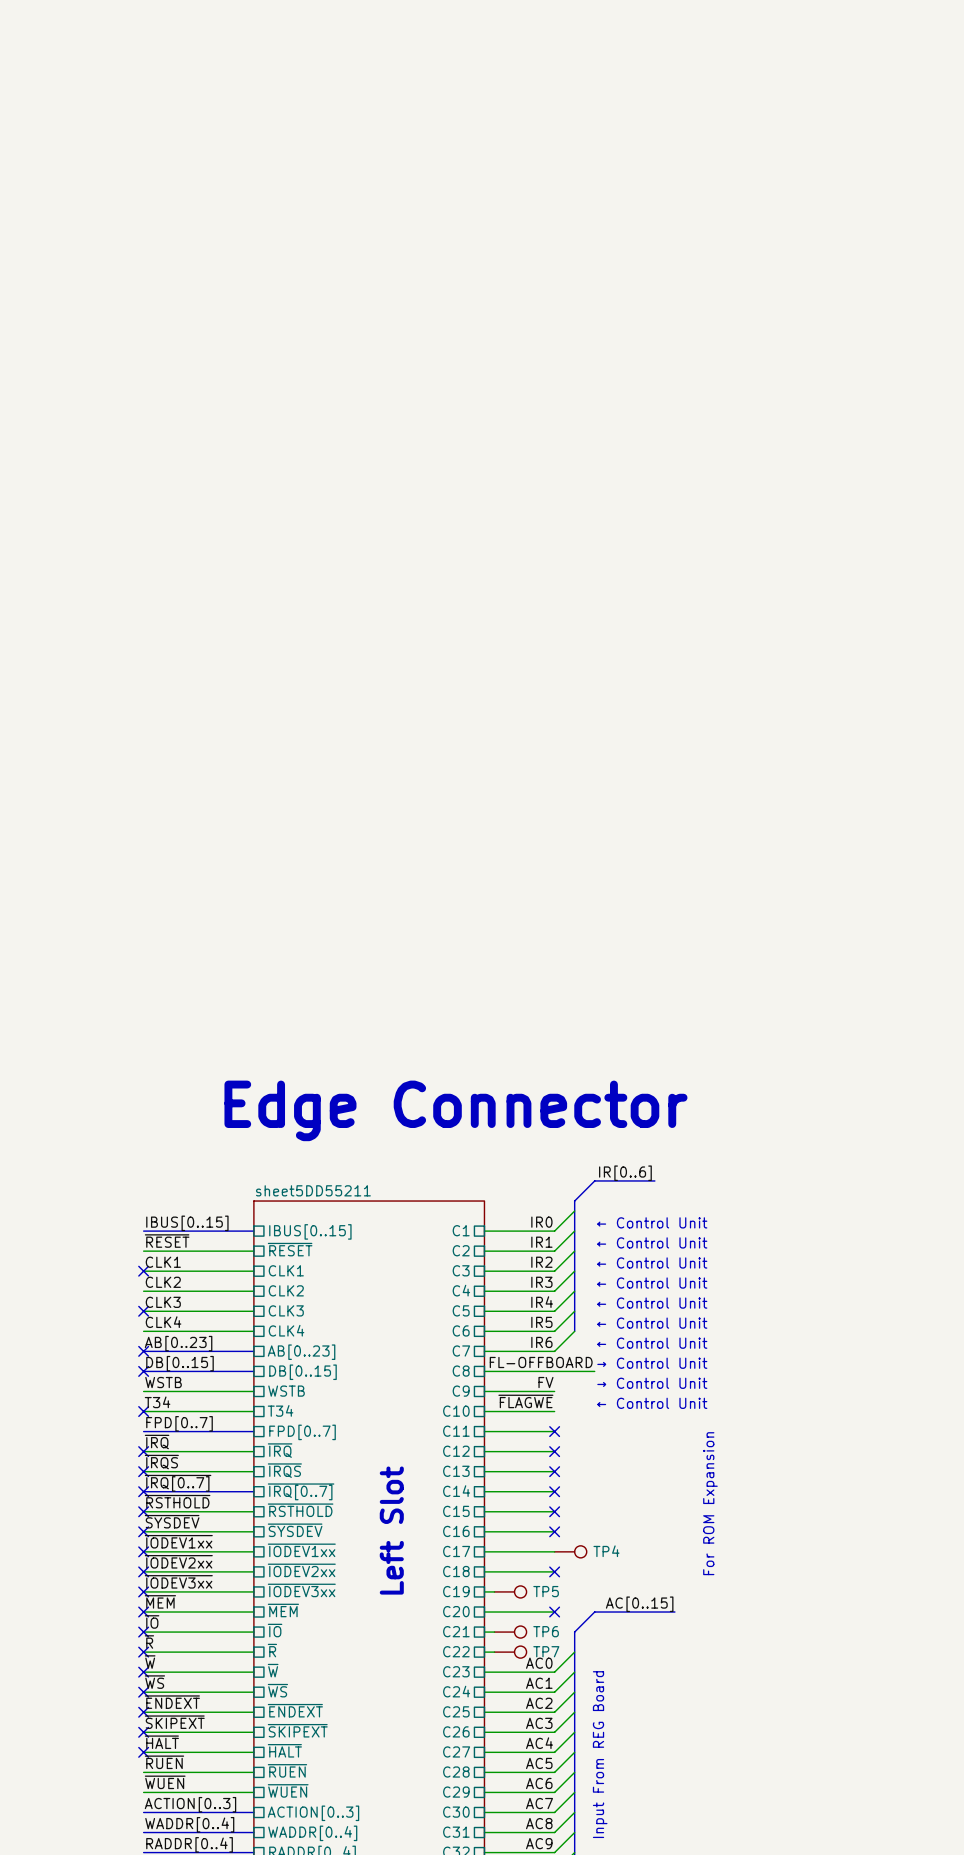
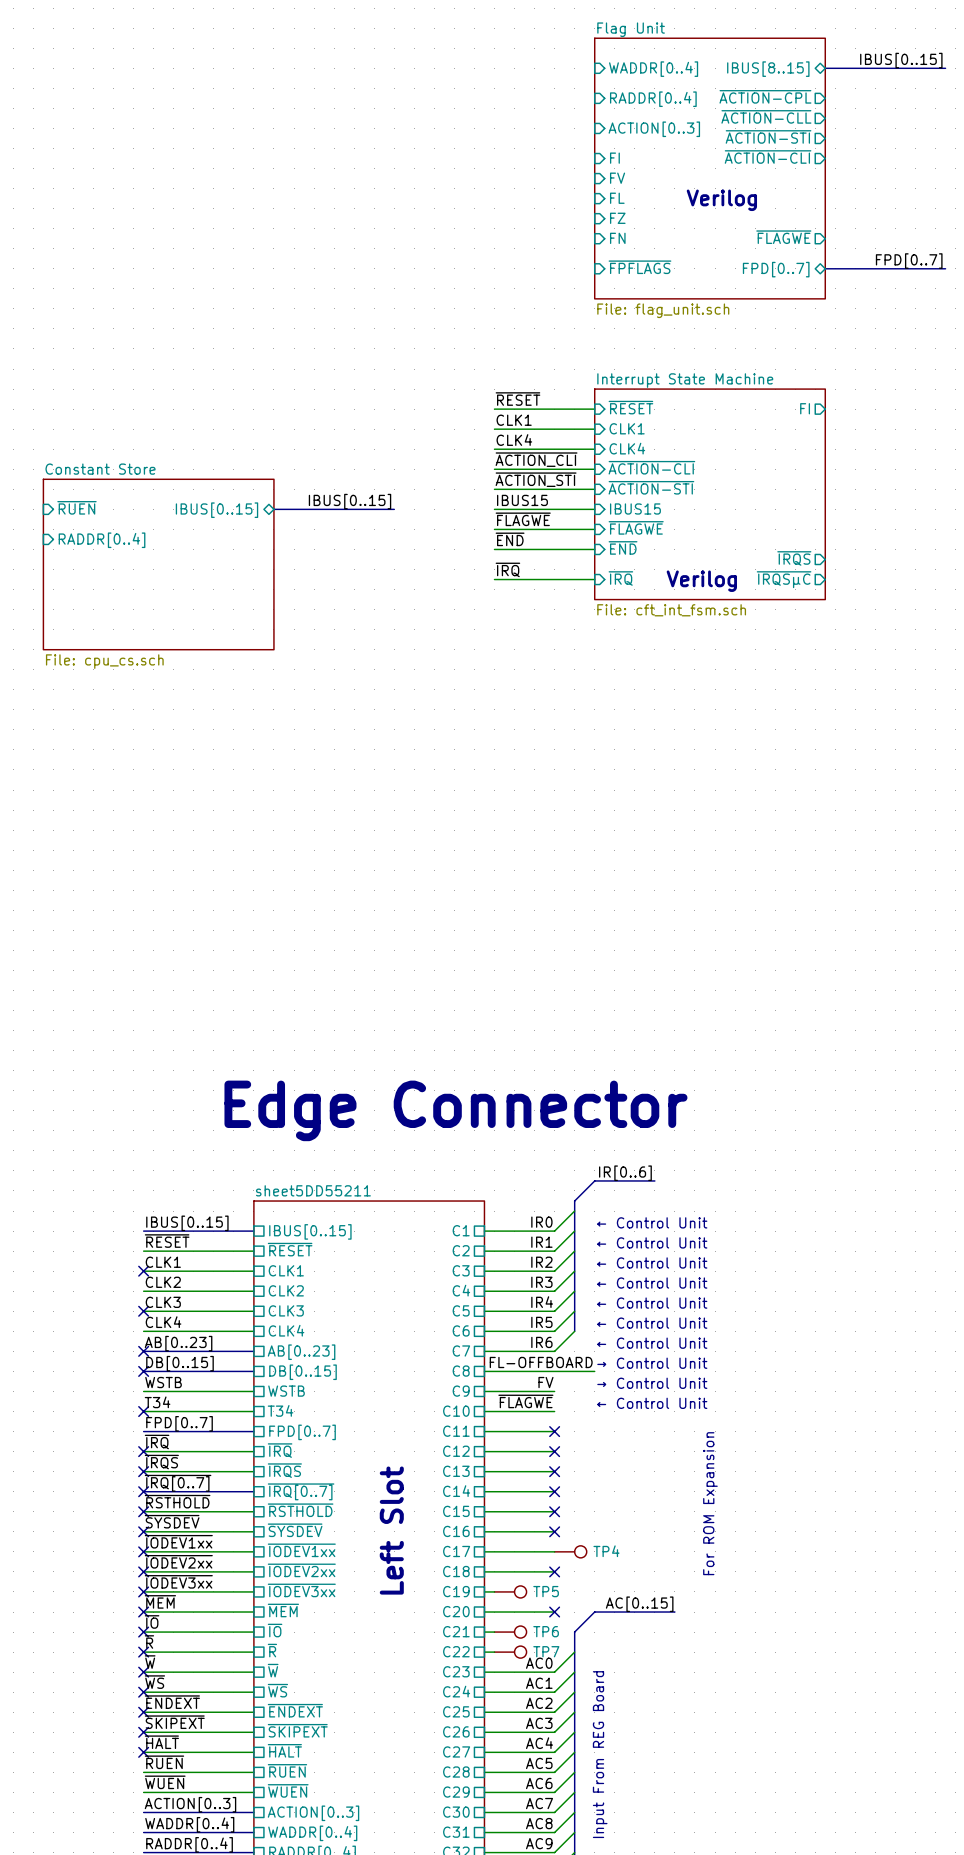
label: none -> IBUS[0..15] (901, 60)
bus: none -> (825, 68) (945, 68)
sheet pin: none -> WADDR[0..4] (653, 69)
sheet pin: none -> IBUS[8..15] (768, 69)
sheet pin: none -> ~{ACTION-CPL} (765, 96)
sheet pin: none -> RADDR[0..4] (653, 99)
sheet pin: none -> ~{ACTION-CLL} (766, 116)
sheet pin: none -> ACTION[0..3] (654, 129)
sheet pin: none -> ~{ACTION-STI} (768, 136)
sheet pin: none -> ~{ACTION-CLI} (768, 157)
sheet pin: none -> FI (614, 158)
sheet Flag Unit: none -> File: flag_unit.sch (710, 168)
sheet pin: none -> FV (617, 178)
sheet pin: none -> FL (617, 198)
text: none -> Verilog (721, 200)
sheet pin: none -> FZ (617, 218)
sheet pin: none -> ~{FLAGWE} (783, 237)
sheet pin: none -> FN (617, 238)
label: none -> FPD[0..7] (909, 261)
sheet pin: none -> ~{FPFLAGS} (639, 267)
bus: none -> (825, 268) (945, 268)
sheet pin: none -> FPD[0..7] (776, 269)
label: none -> ~{RESET} (517, 399)
sheet pin: none -> ~{RESET} (630, 407)
sheet pin: none -> FI (805, 408)
wire: none -> (494, 409) (594, 409)
label: none -> CLK1 (514, 420)
sheet pin: none -> CLK1 (627, 428)
wire: none -> (494, 429) (594, 429)
label: none -> CLK4 (514, 440)
sheet pin: none -> CLK4 (627, 448)
wire: none -> (494, 449) (594, 449)
label: none -> ~{ACTION_CLI} (536, 459)
sheet pin: none -> ~{ACTION-CLI} (651, 467)
wire: none -> (494, 469) (594, 469)
label: none -> ~{ACTION_STI} (536, 479)
sheet pin: none -> ~{ACTION-STI} (651, 487)
wire: none -> (494, 489) (594, 489)
sheet Interrupt State Machine: none -> File: cft_int_fsm.sch (710, 494)
label: none -> IBUS15 (522, 500)
label: none -> IBUS[0..15] (350, 501)
sheet pin: none -> ~{RUEN} (76, 507)
sheet pin: none -> IBUS15 (635, 508)
bus: none -> (273, 509) (394, 509)
wire: none -> (494, 509) (594, 509)
sheet pin: none -> IBUS[0..15] (216, 510)
label: none -> ~{FLAGWE} (523, 519)
sheet pin: none -> ~{FLAGWE} (636, 527)
wire: none -> (494, 529) (594, 529)
label: none -> ~{END} (510, 539)
sheet pin: none -> RADDR[0..4] (102, 540)
sheet pin: none -> ~{END} (623, 547)
wire: none -> (494, 549) (594, 549)
sheet pin: none -> ~{IRQS} (794, 558)
sheet Constant Store: none -> File: cpu_cs.sch (158, 564)
label: none -> ~{IRQ} (507, 569)
sheet pin: none -> ~{IRQ} (620, 578)
wire: none -> (494, 579) (594, 579)
sheet pin: none -> ~{IRQSµC} (784, 579)
text: none -> Verilog (701, 581)

